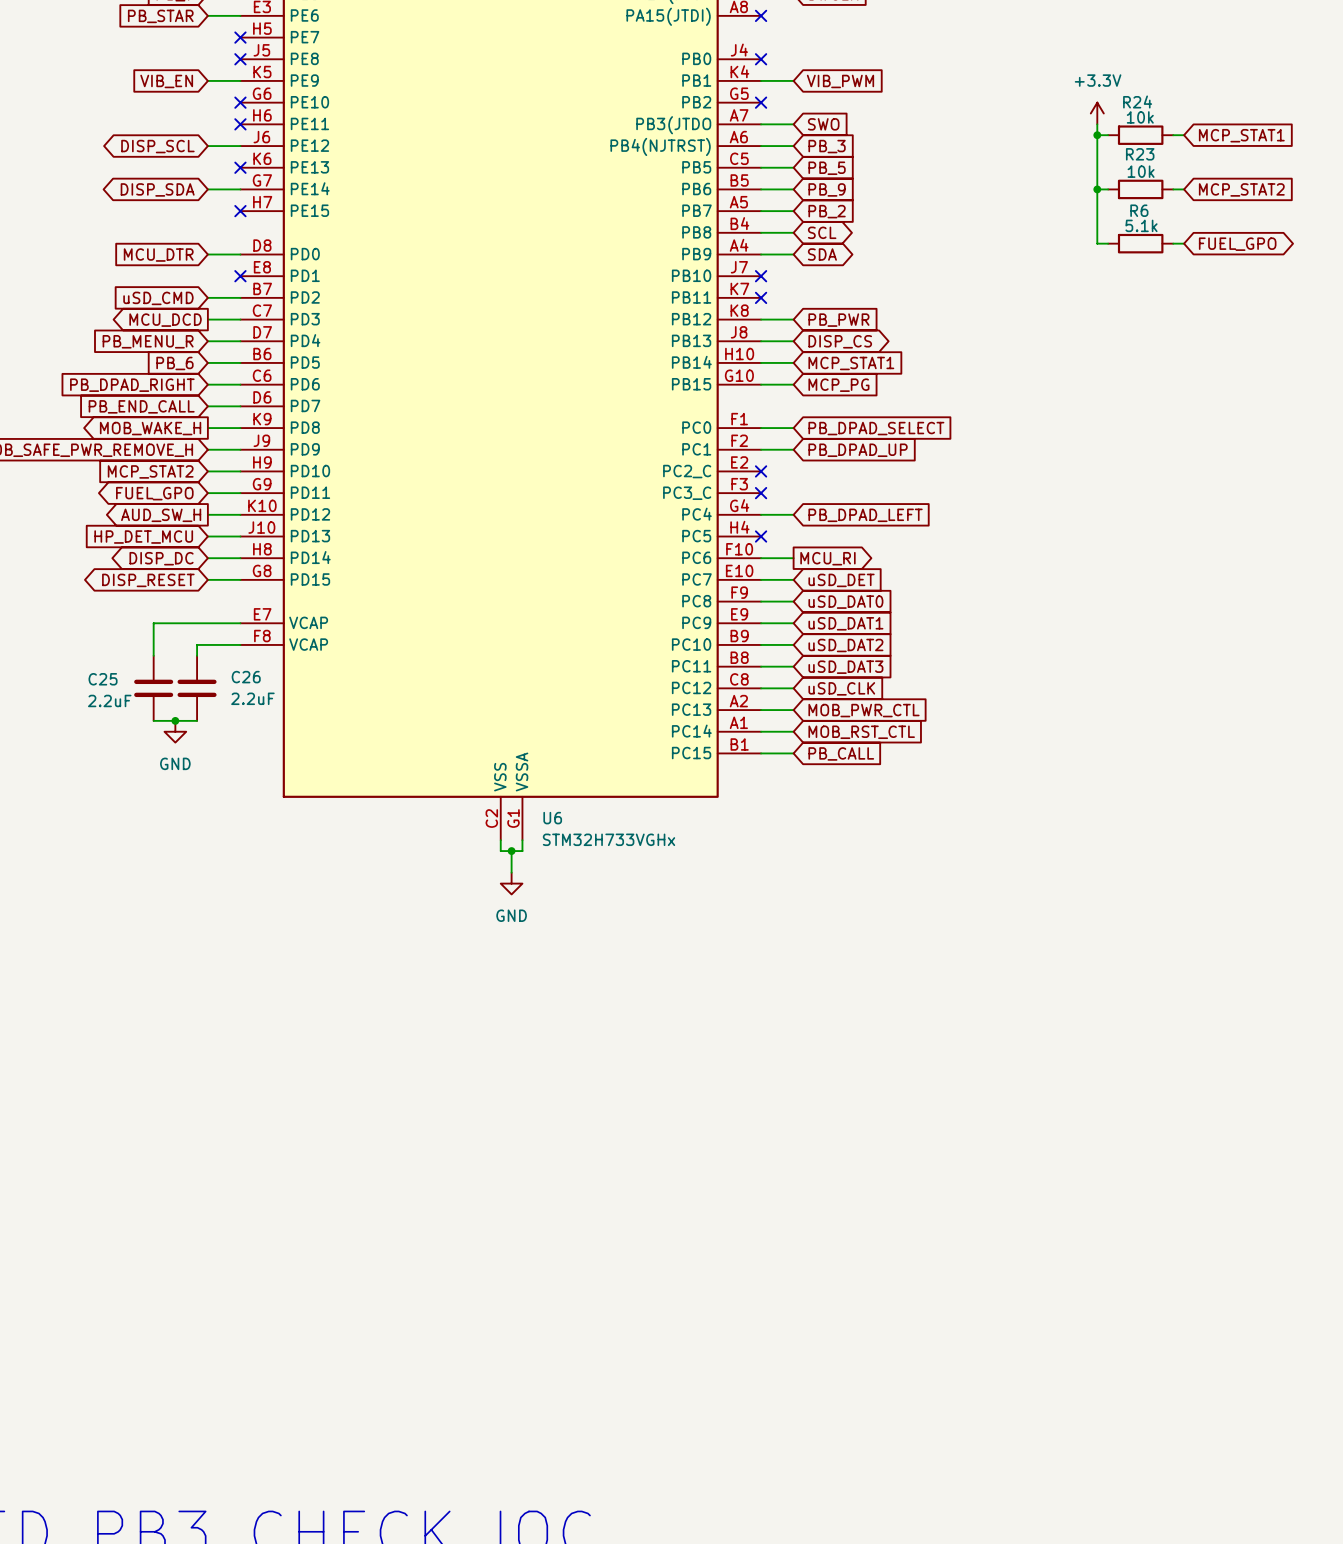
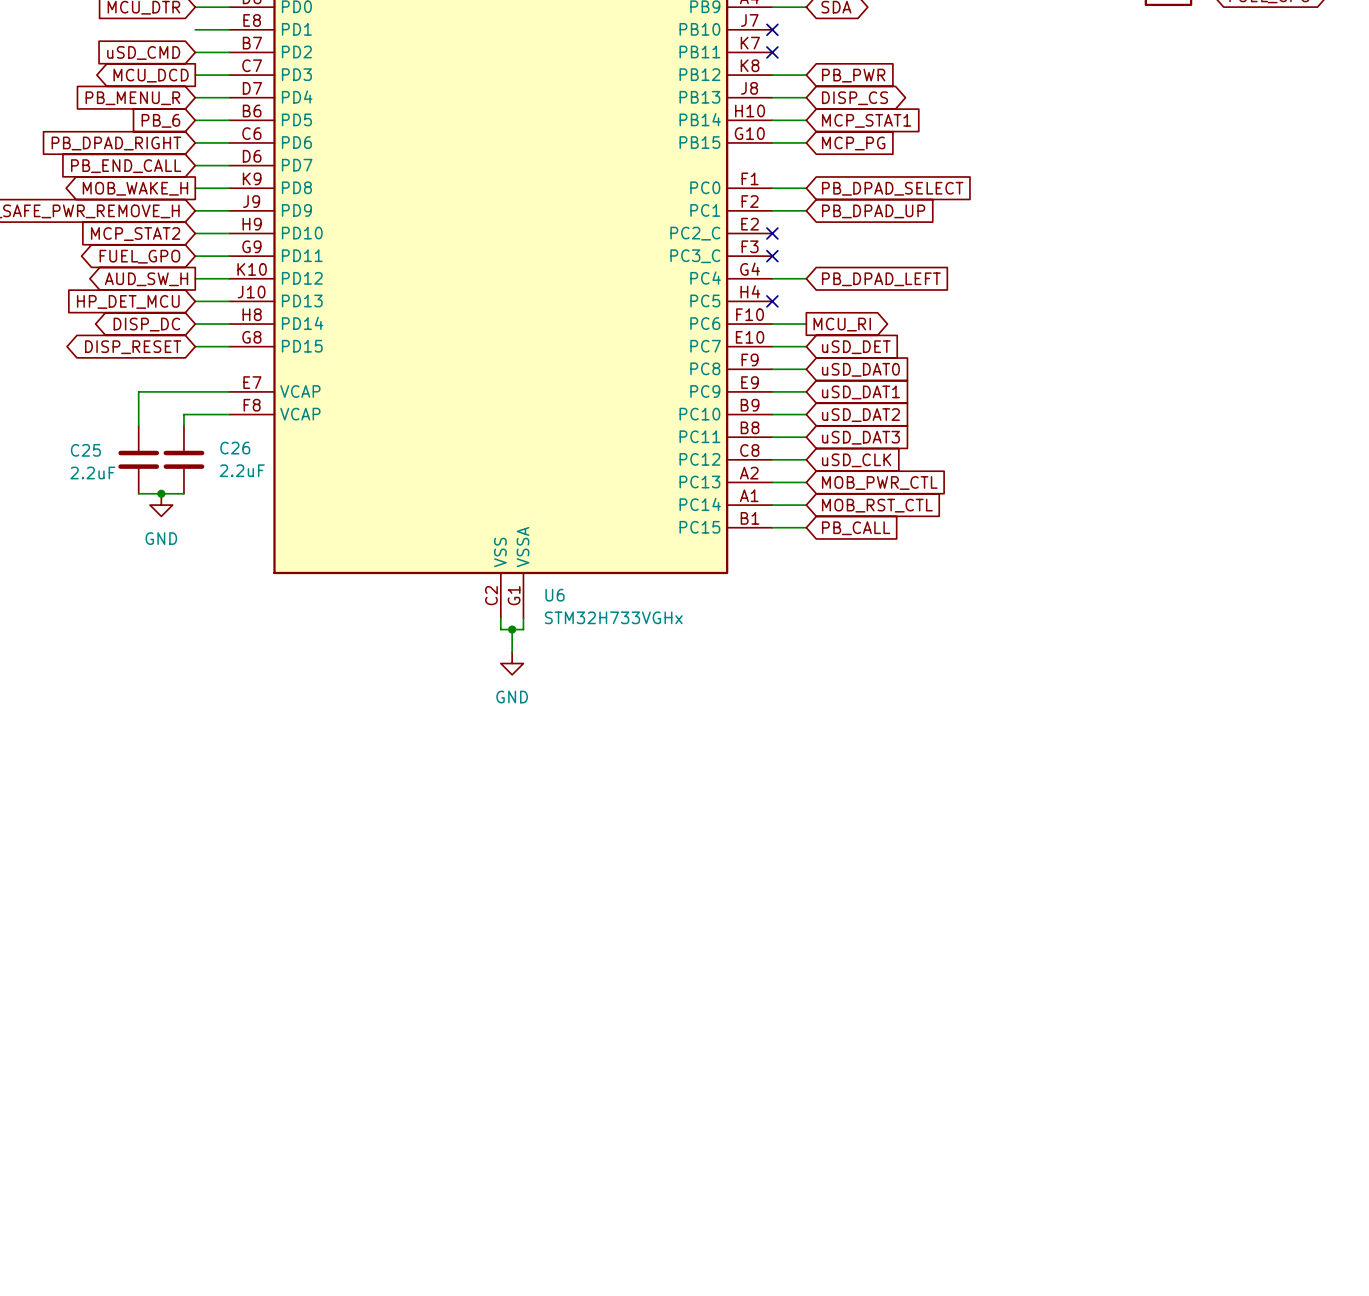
wire: none -> (195, 29) (229, 29)
no-connect mark: (240, 276) -> none

